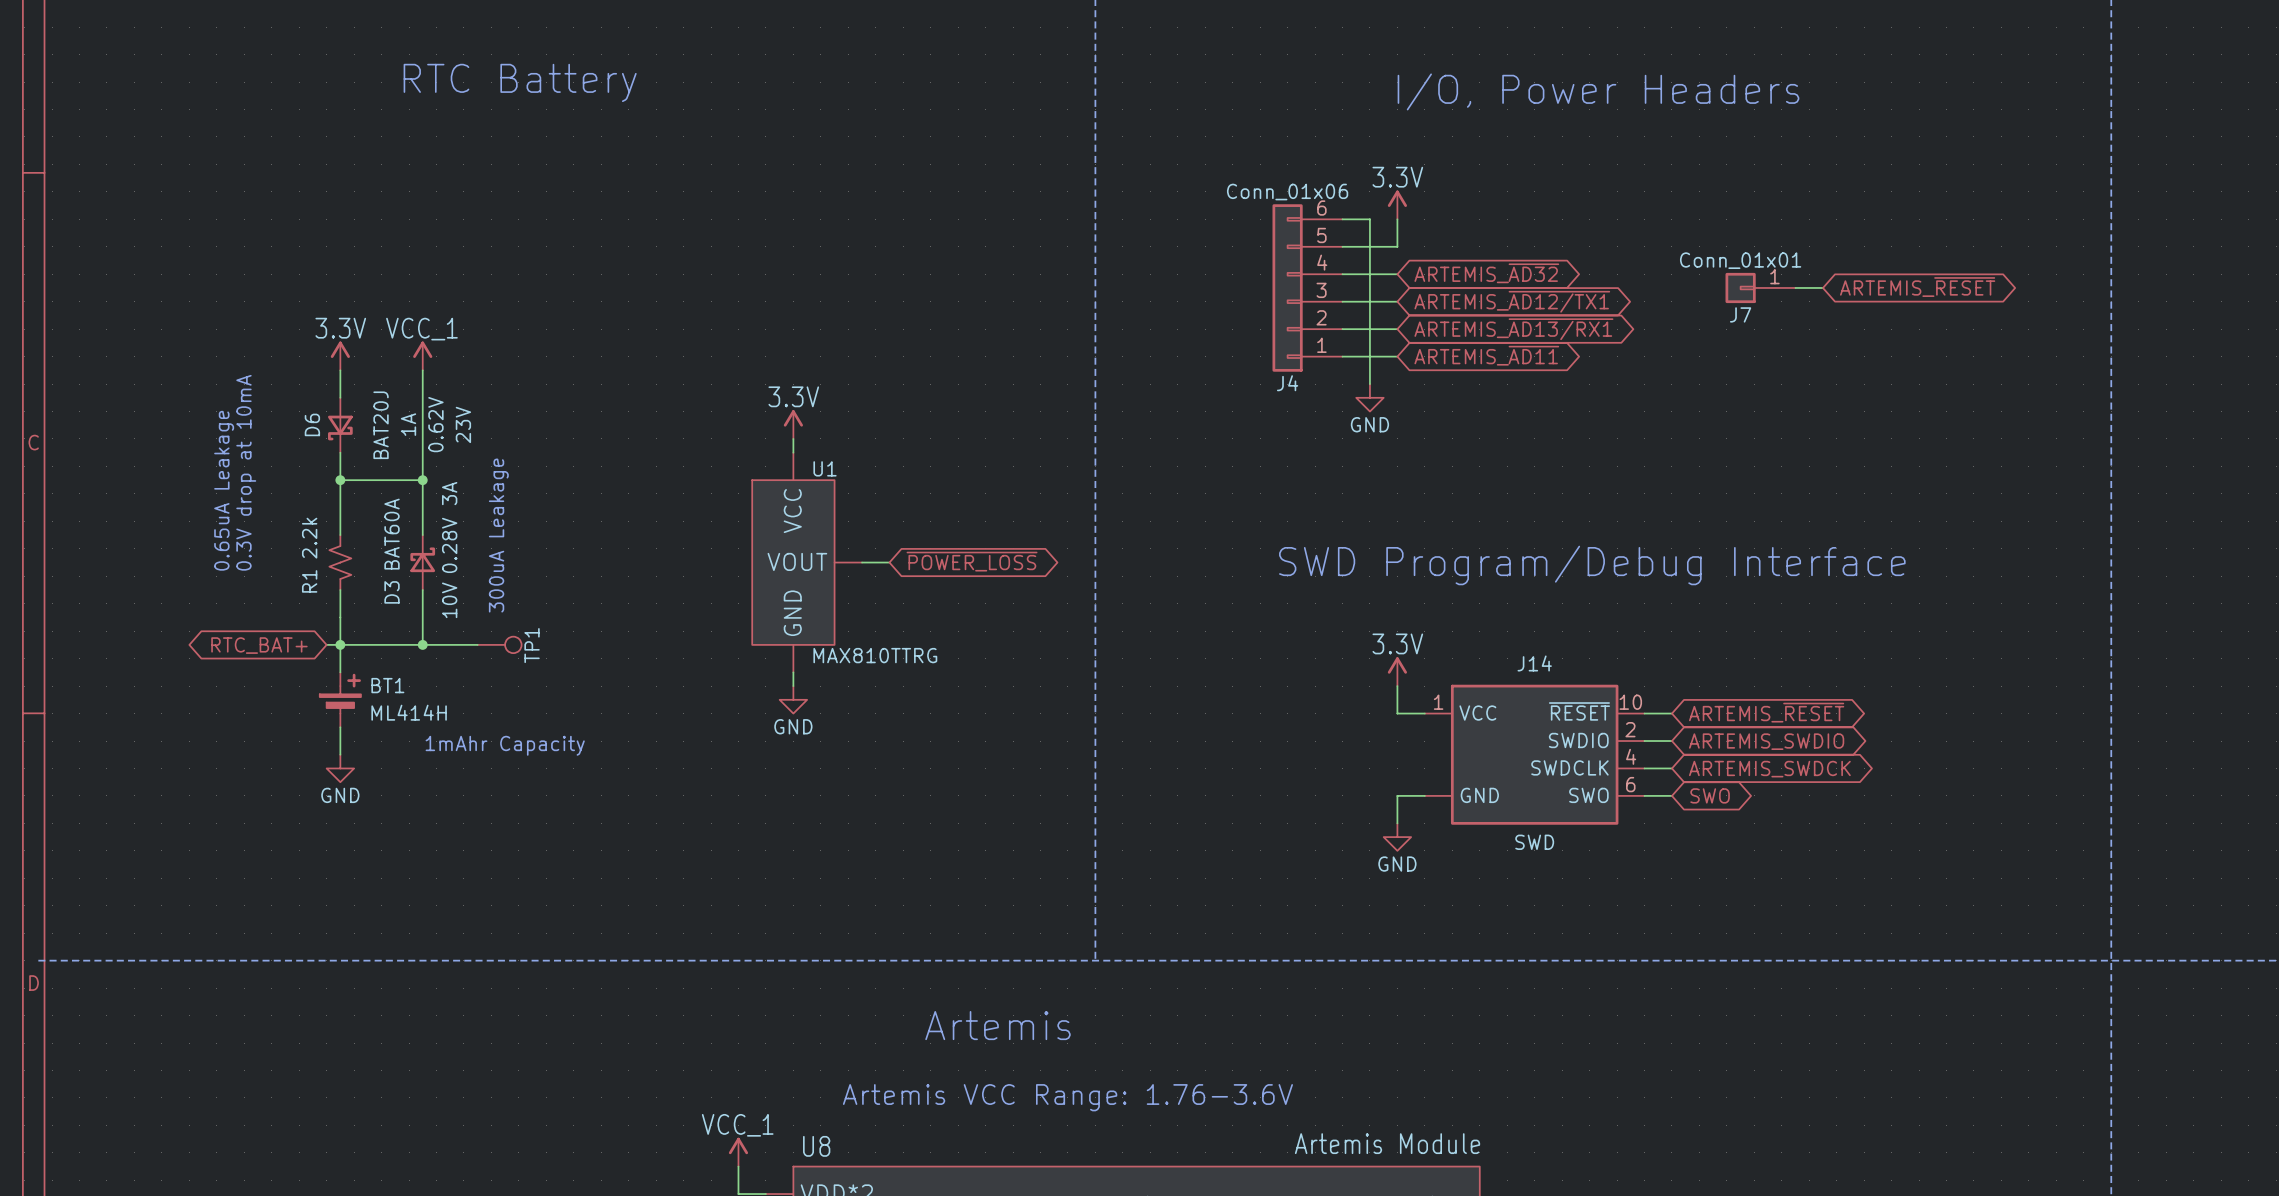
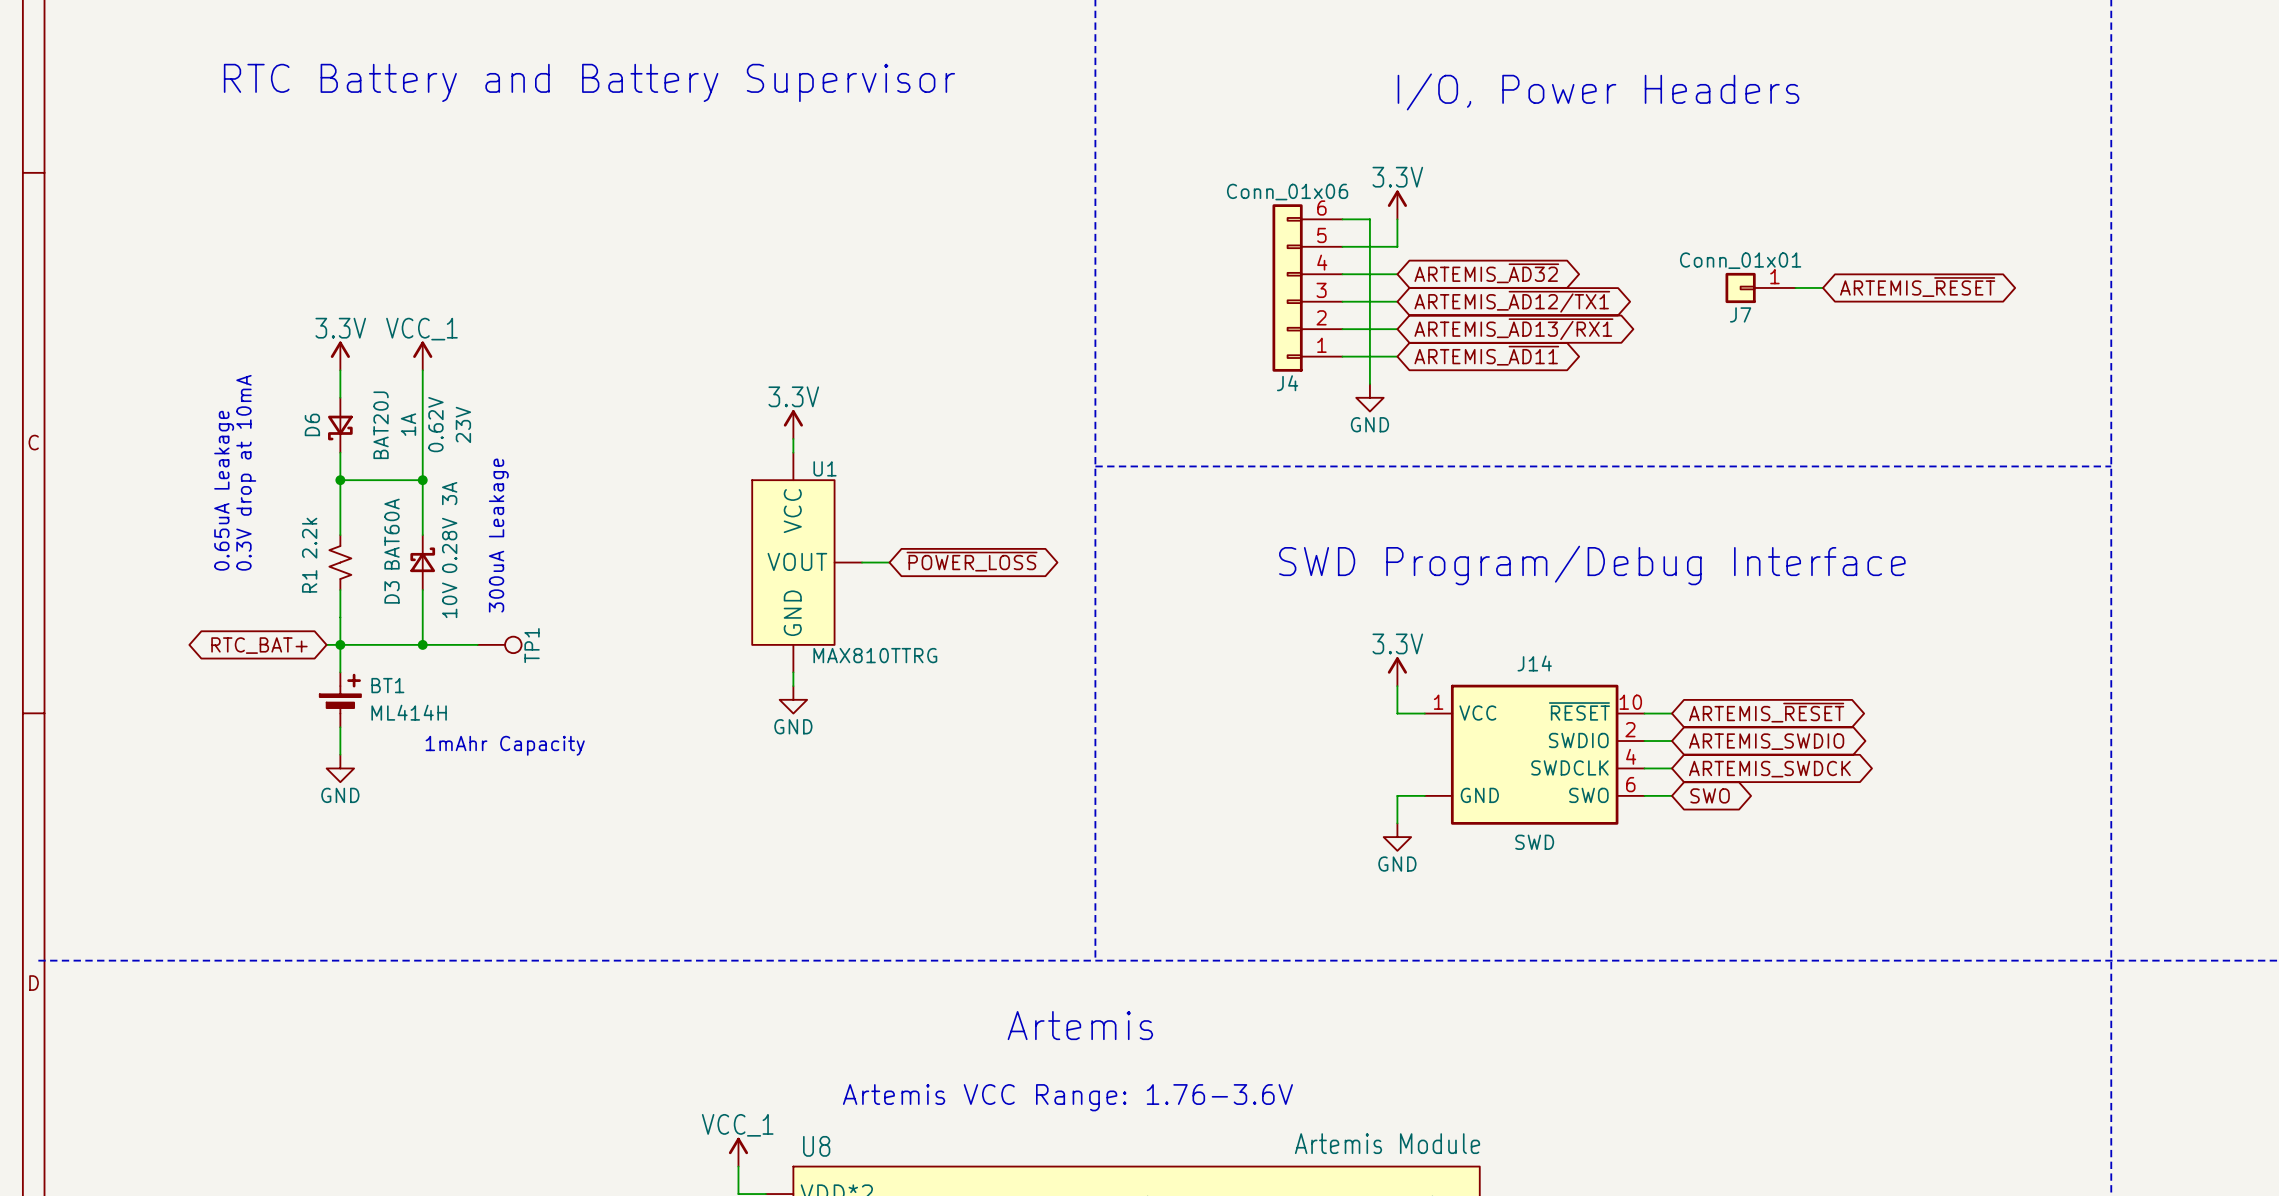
text: RTC Battery (520, 82) -> none
text: none -> RTC Battery and Battery Supervisor (589, 82)
line: none -> (1095, 466) (2111, 466)
text position: Artemis (997, 1025) -> Artemis (1080, 1025)

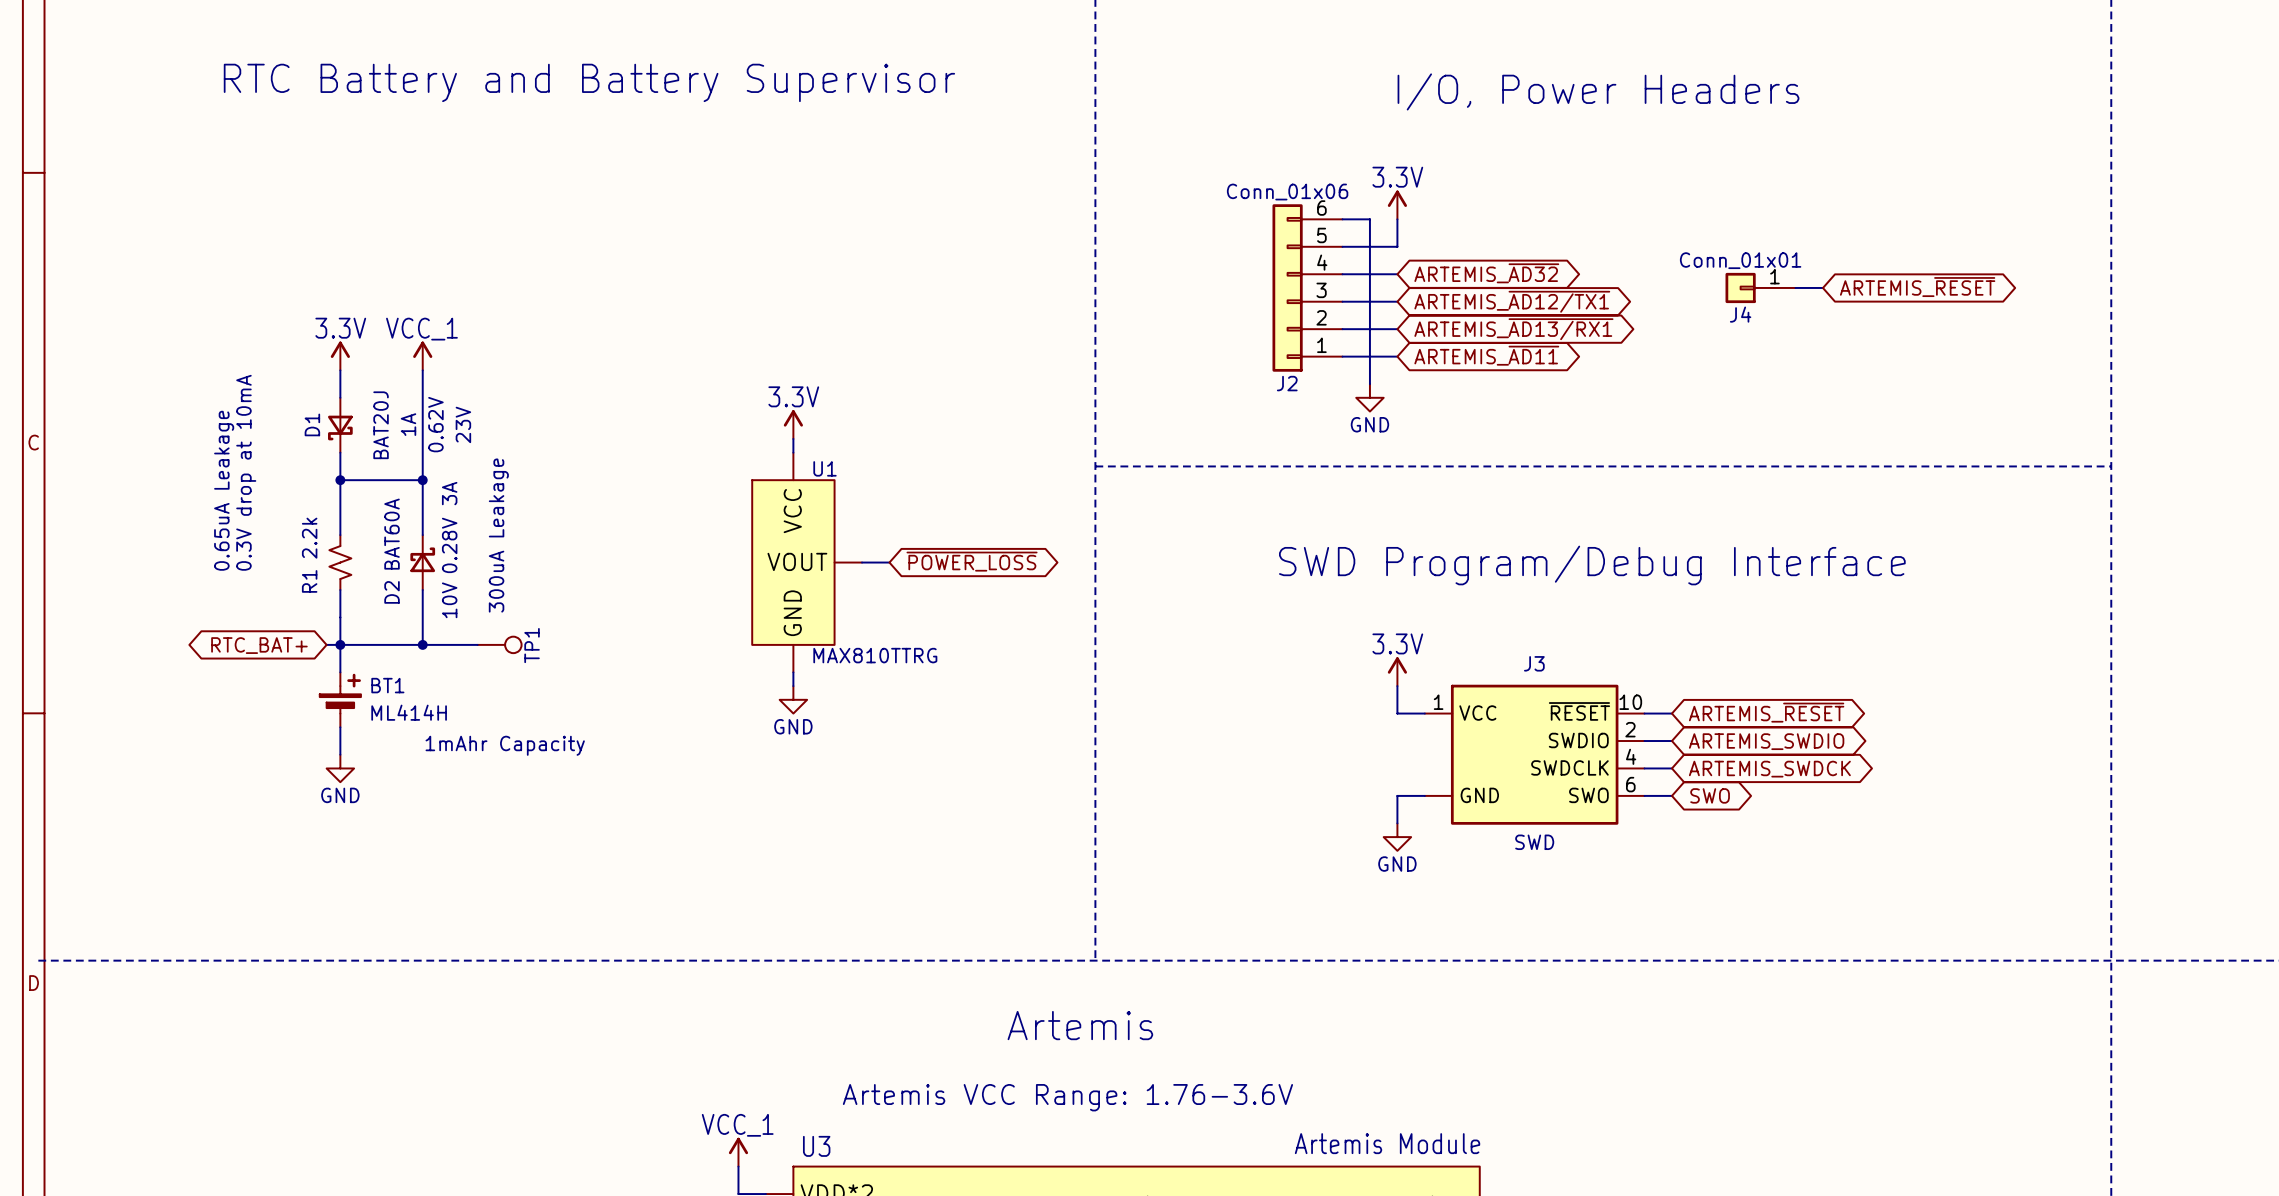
J7 name: J7 (1740, 314) -> J4 (1740, 314)
J4 name: J4 (1287, 383) -> J2 (1287, 383)
D6 name: D6 (312, 424) -> D1 (312, 424)
D3 name: D3 (392, 592) -> D2 (392, 592)
J14 name: J14 (1534, 663) -> J3 (1534, 663)
U8 name: U8 (816, 1146) -> U3 (816, 1146)

